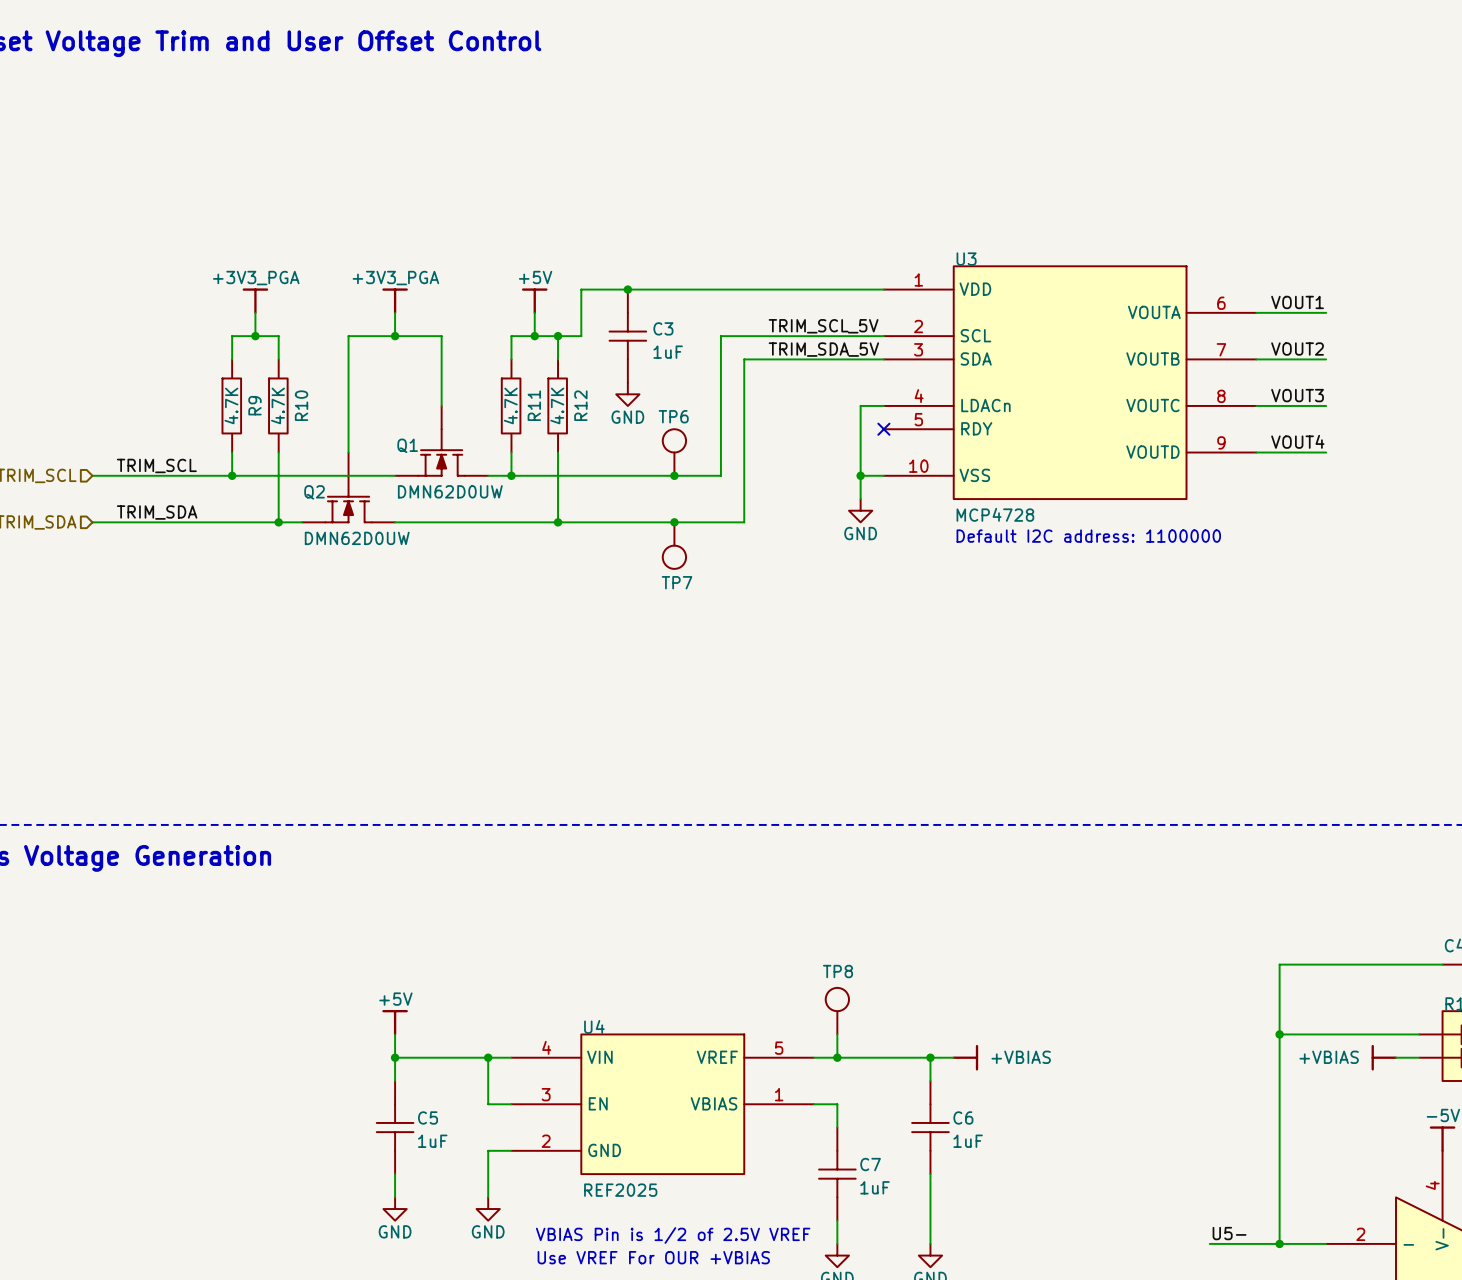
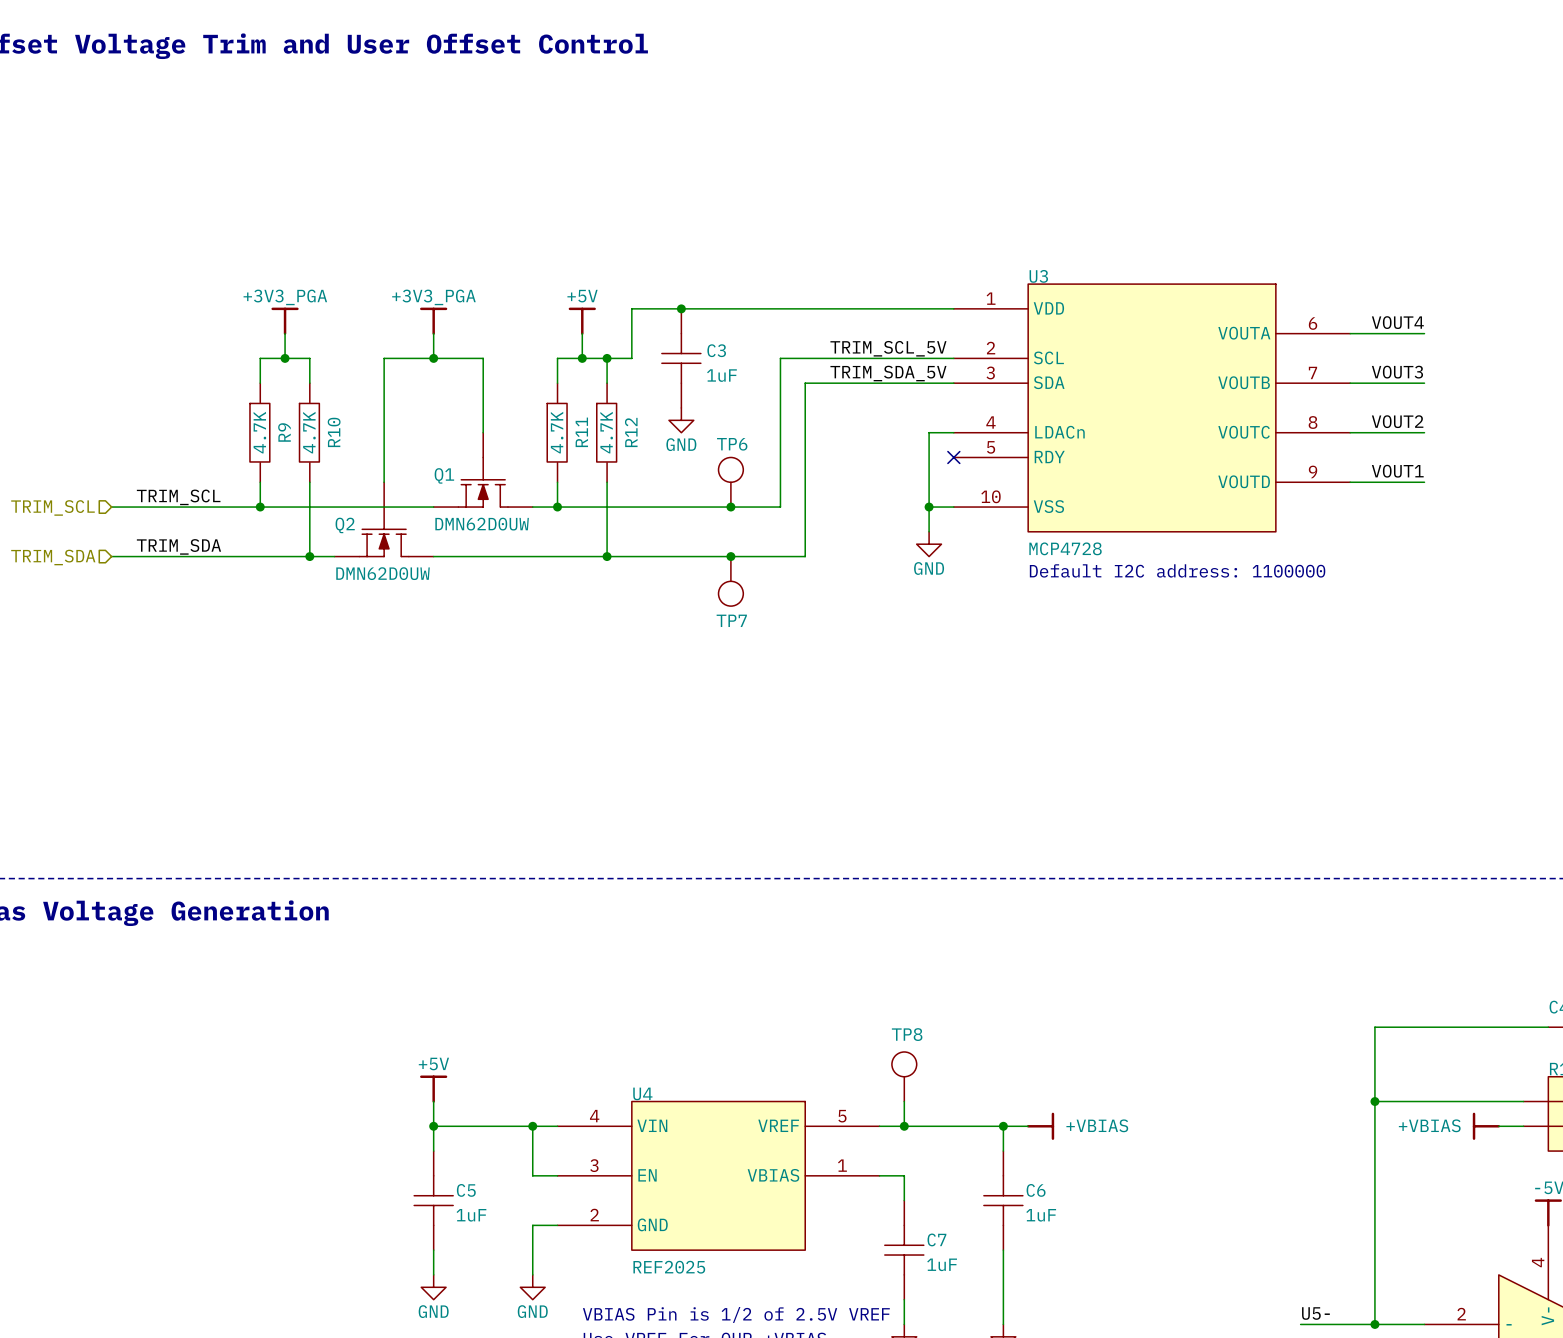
label: VOUT1 (1297, 302) -> VOUT4 (1397, 322)
label: VOUT2 (1297, 349) -> VOUT3 (1397, 372)
label: VOUT3 (1297, 395) -> VOUT2 (1397, 421)
label: VOUT4 (1297, 441) -> VOUT1 (1397, 471)

